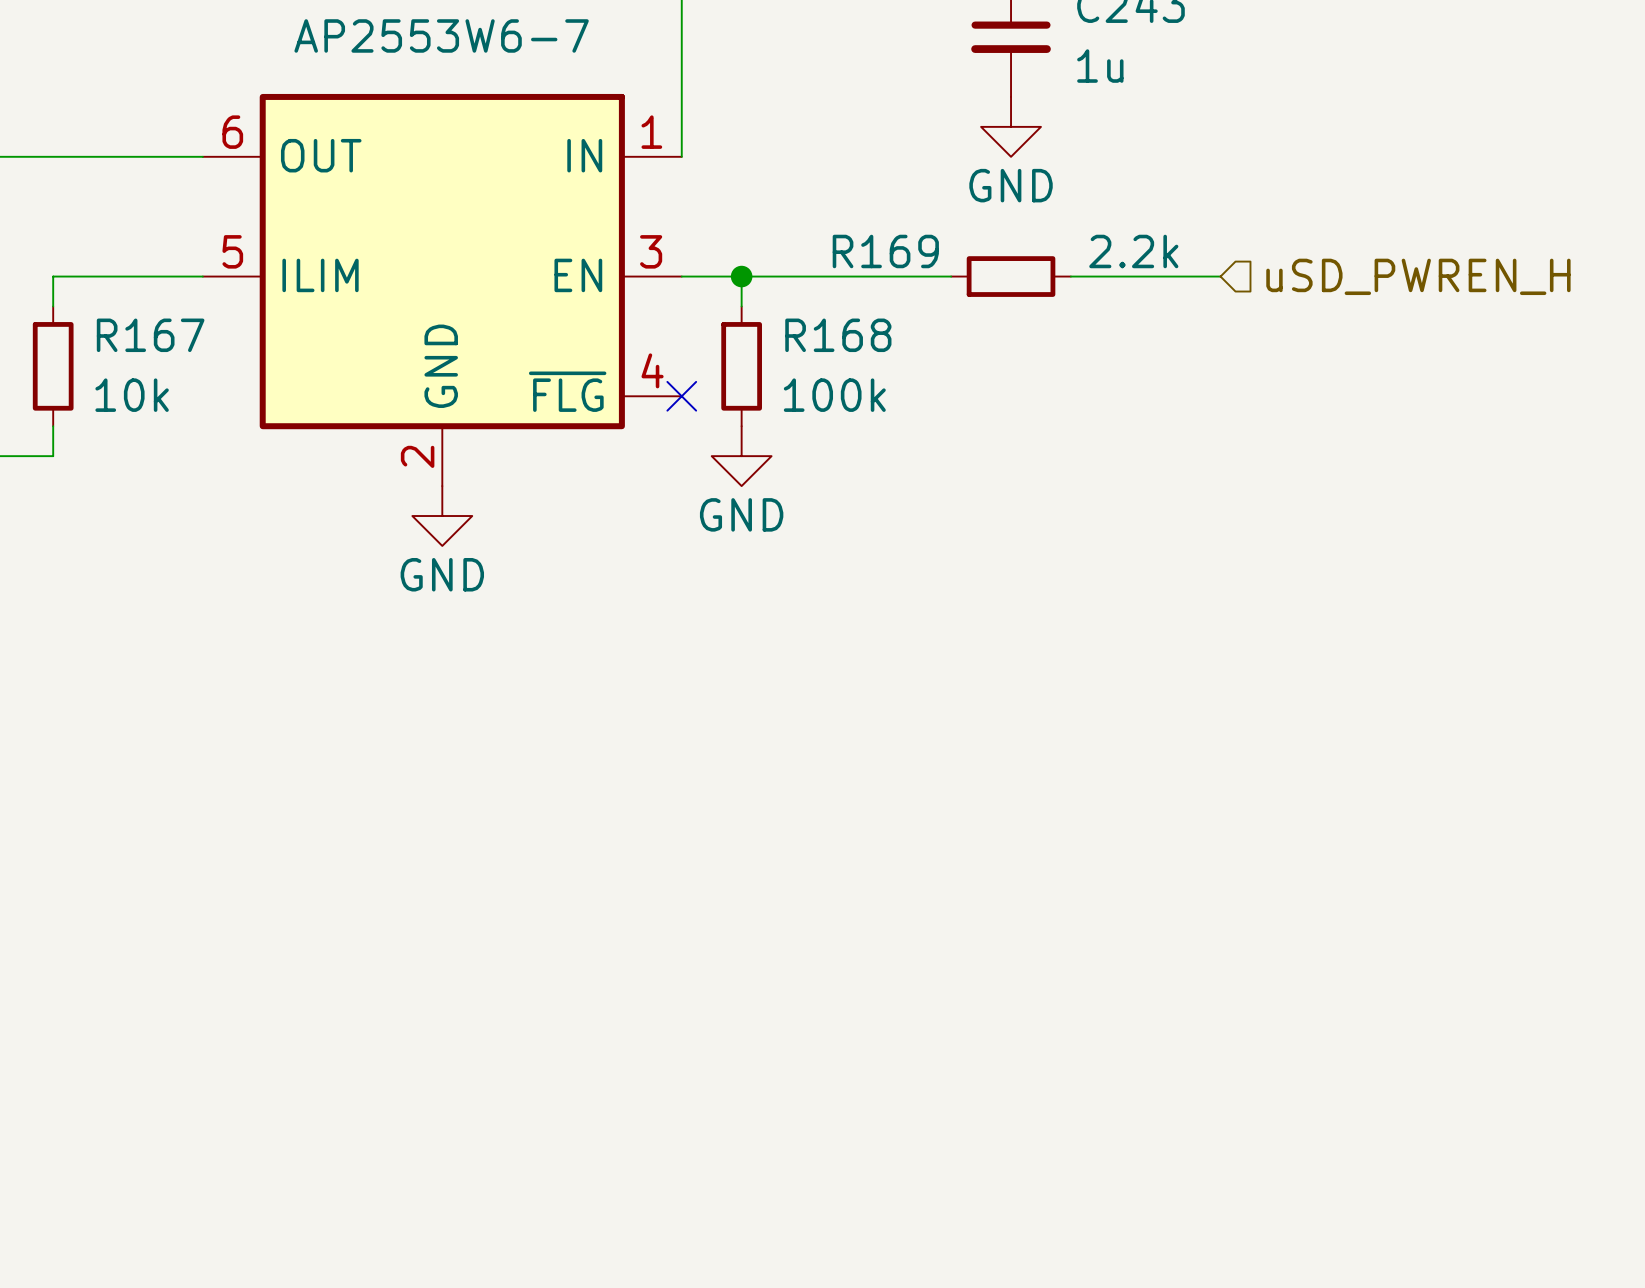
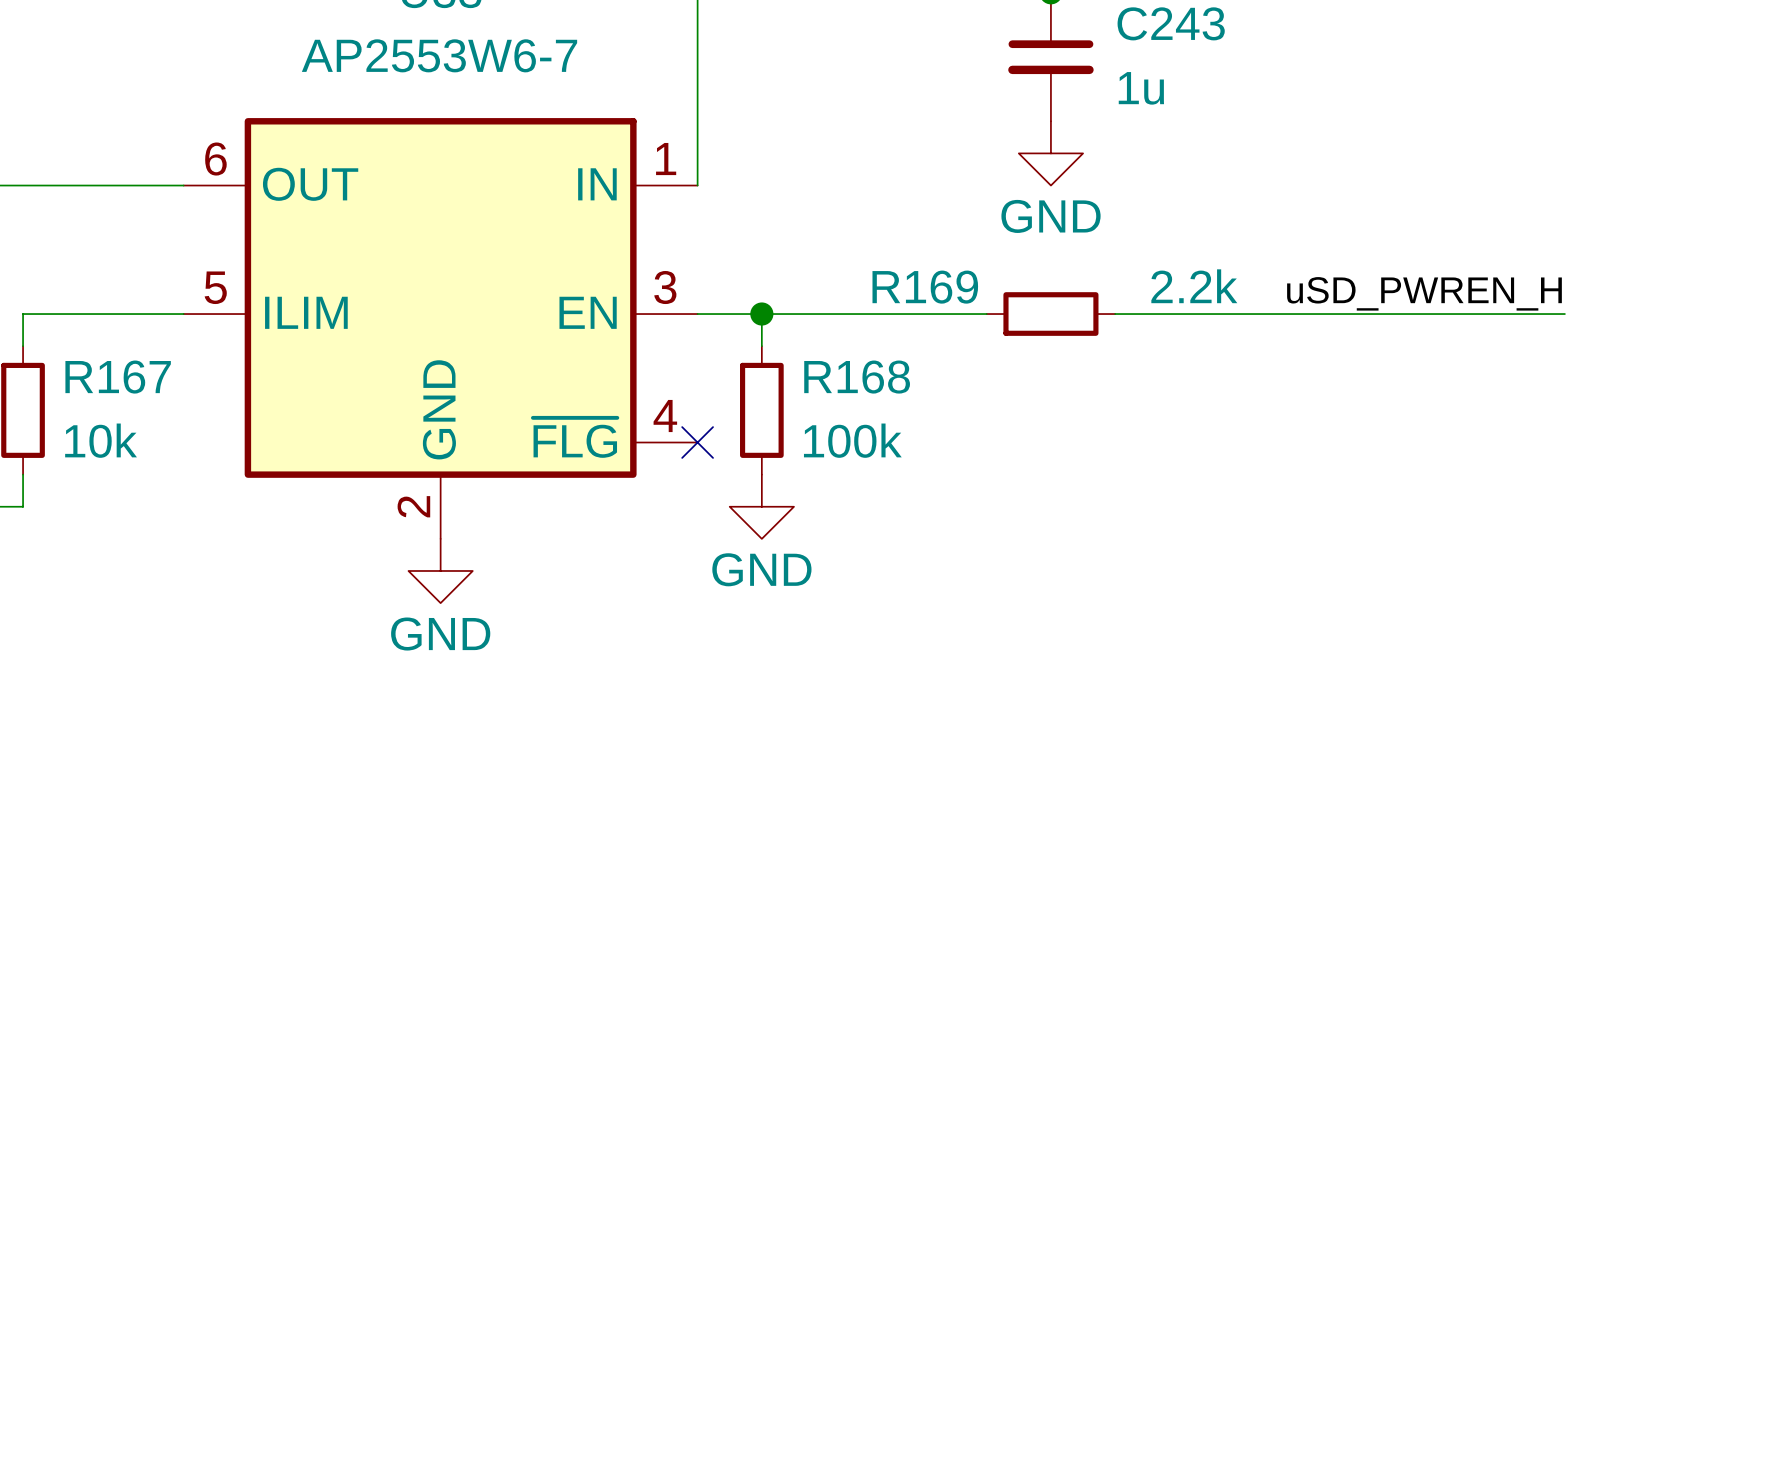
label: none -> uSD_PWREN_H (1424, 293)
wire: none -> (1275, 314) (1564, 314)
hierarchical label: uSD_PWREN_H (1418, 276) -> none

